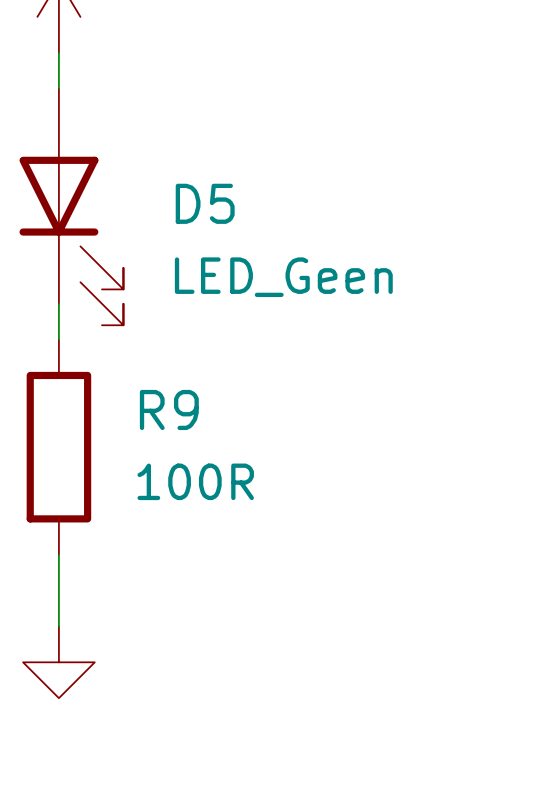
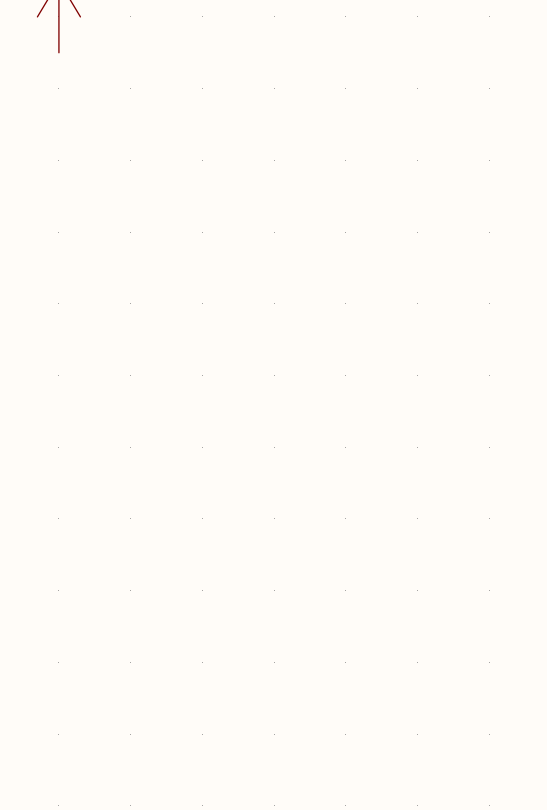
wire: (58, 52) (58, 88) -> none
D5: LED_Geen (71, 206) -> none
wire: (58, 303) (58, 339) -> none
R9: 100R (58, 447) -> none
wire: (58, 554) (58, 626) -> none
power symbol: (58, 662) -> none

